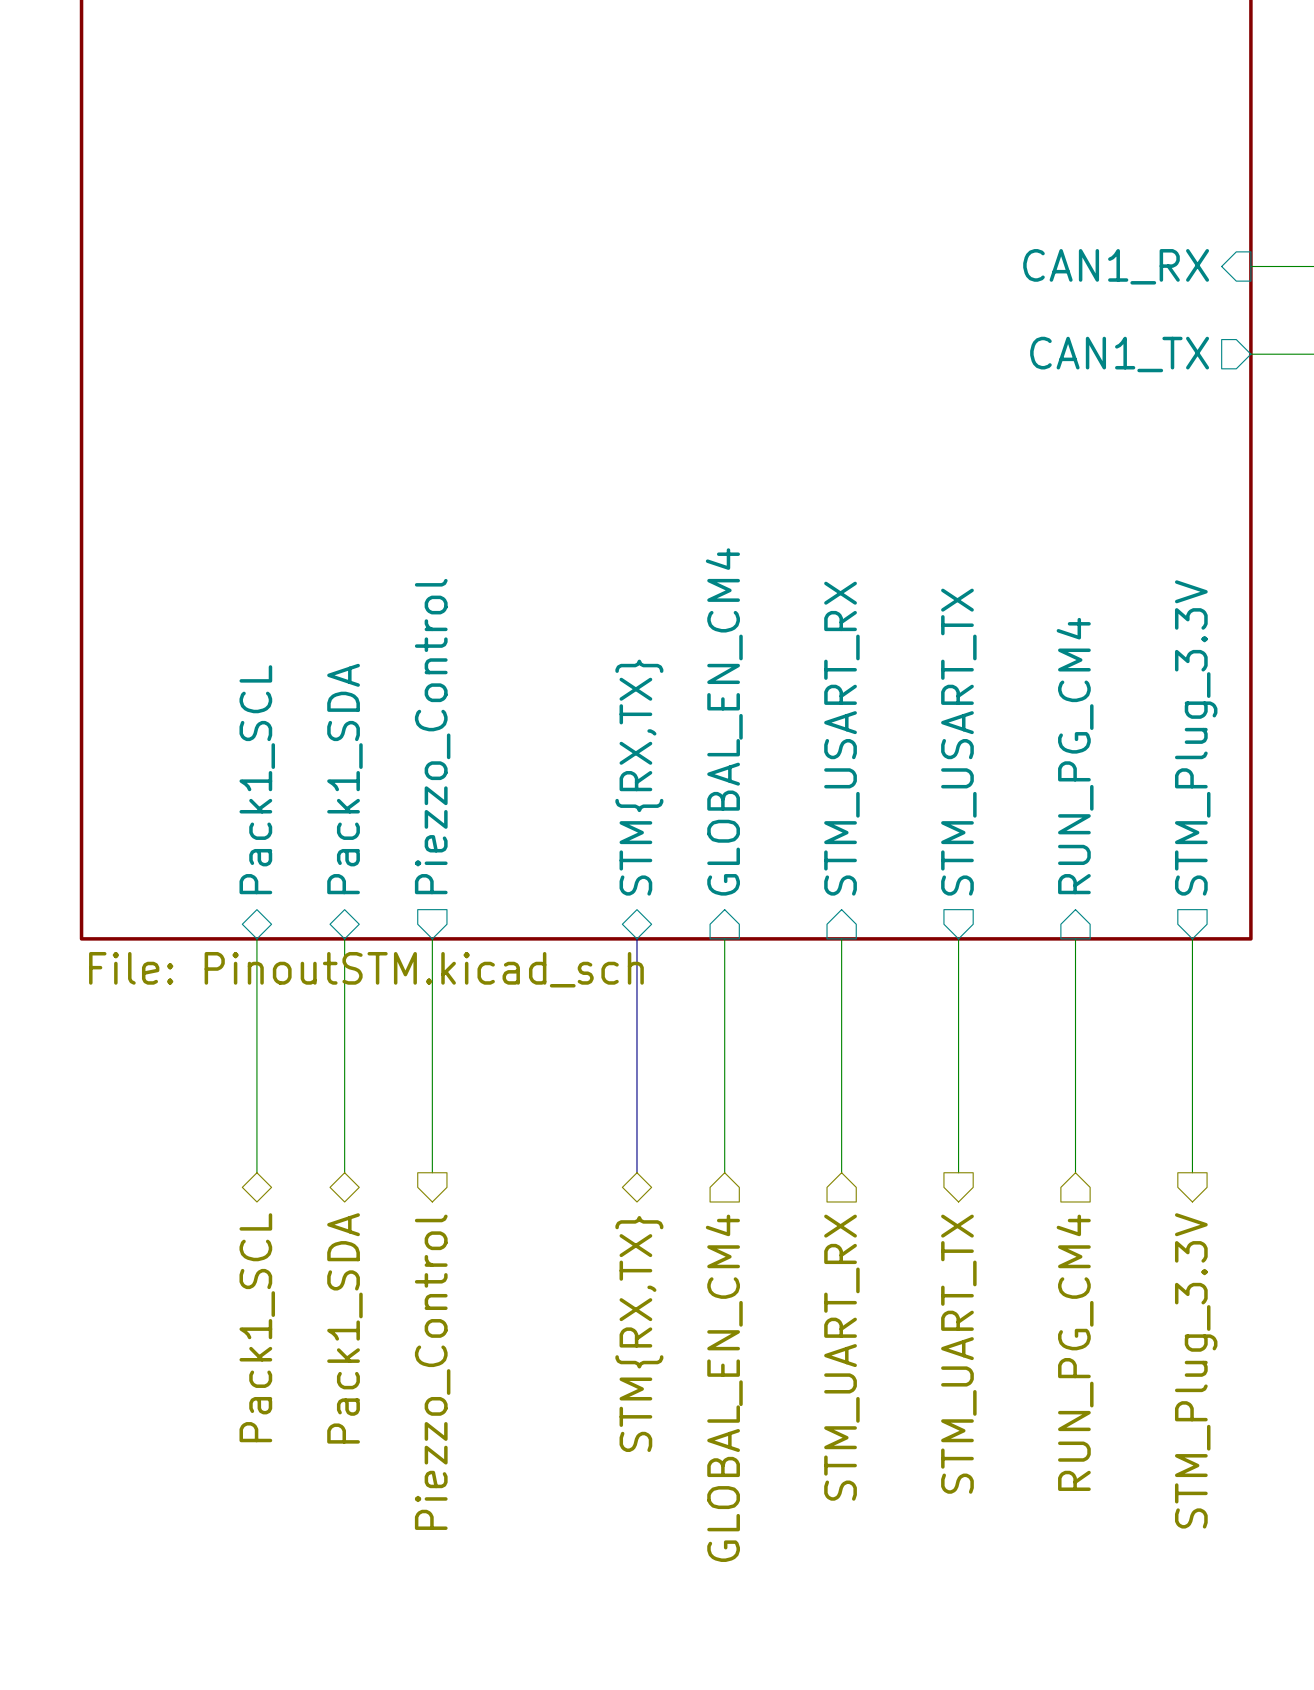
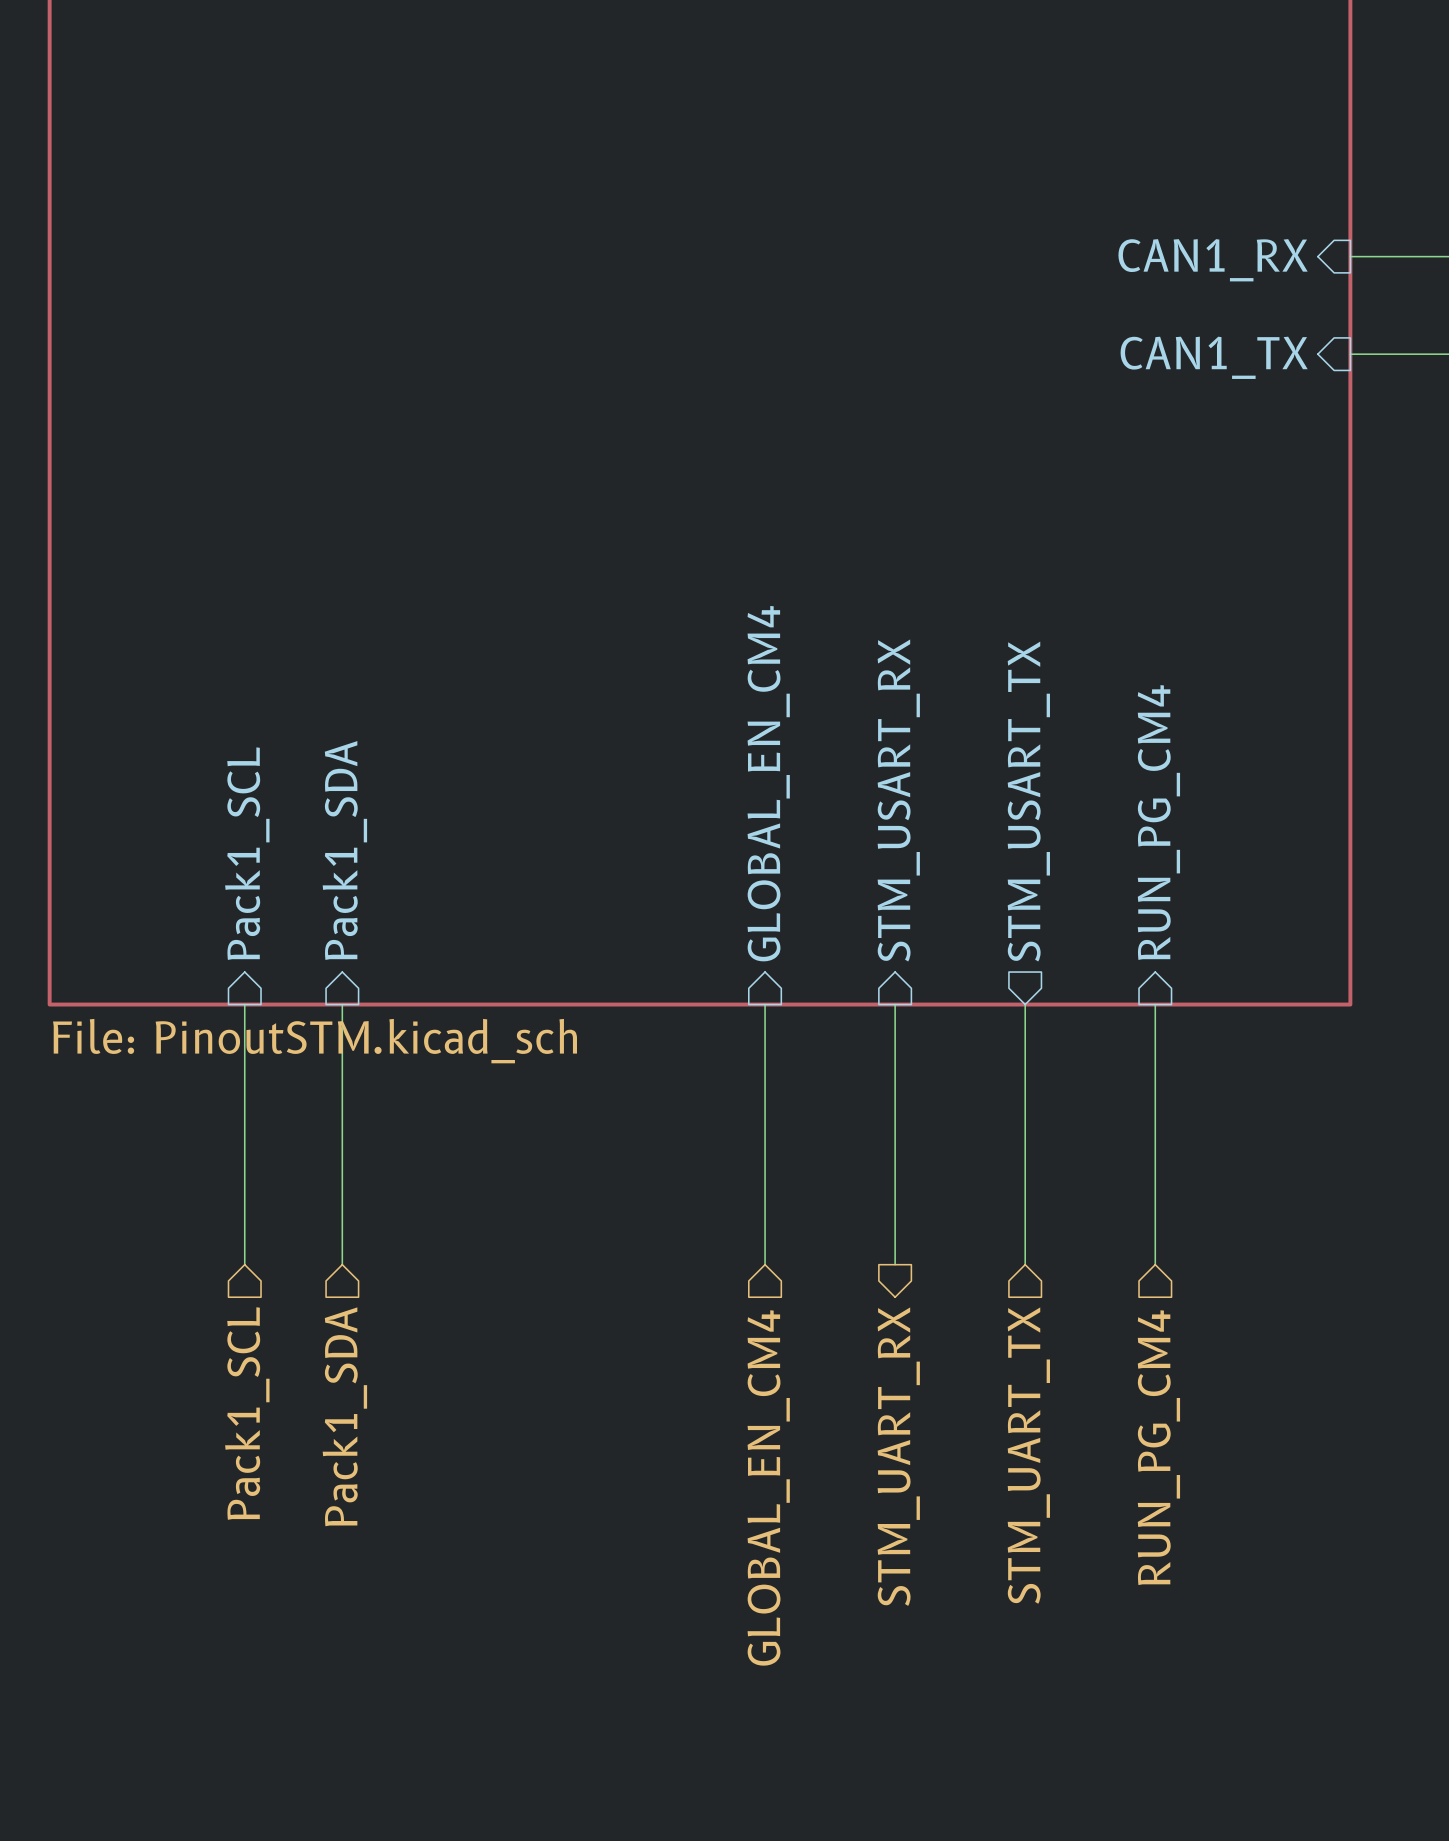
sheet pin shape: output (1119, 354) -> input (1214, 357)
sheet pin: Piezzo_Control (432, 736) -> none
sheet pin: STM_Plug_3.3V (1196, 737) -> none
sheet pin: STM{RX,TX} (639, 777) -> none
sheet pin shape: bidirectional (257, 779) -> input (247, 853)
sheet pin shape: bidirectional (344, 779) -> input (344, 850)
wire: (432, 938) (432, 1172) -> none
bus: (636, 938) (636, 1172) -> none
wire: (1192, 938) (1192, 1172) -> none
hierarchical label shape: bidirectional (257, 1327) -> input (247, 1413)
hierarchical label shape: bidirectional (344, 1328) -> input (344, 1416)
hierarchical label: STM{RX,TX} (639, 1334) -> none
hierarchical label shape: output (958, 1354) -> input (1028, 1455)
hierarchical label shape: input (841, 1357) -> output (898, 1456)
hierarchical label: STM_Plug_3.3V (1196, 1370) -> none
hierarchical label: Piezzo_Control (432, 1372) -> none

